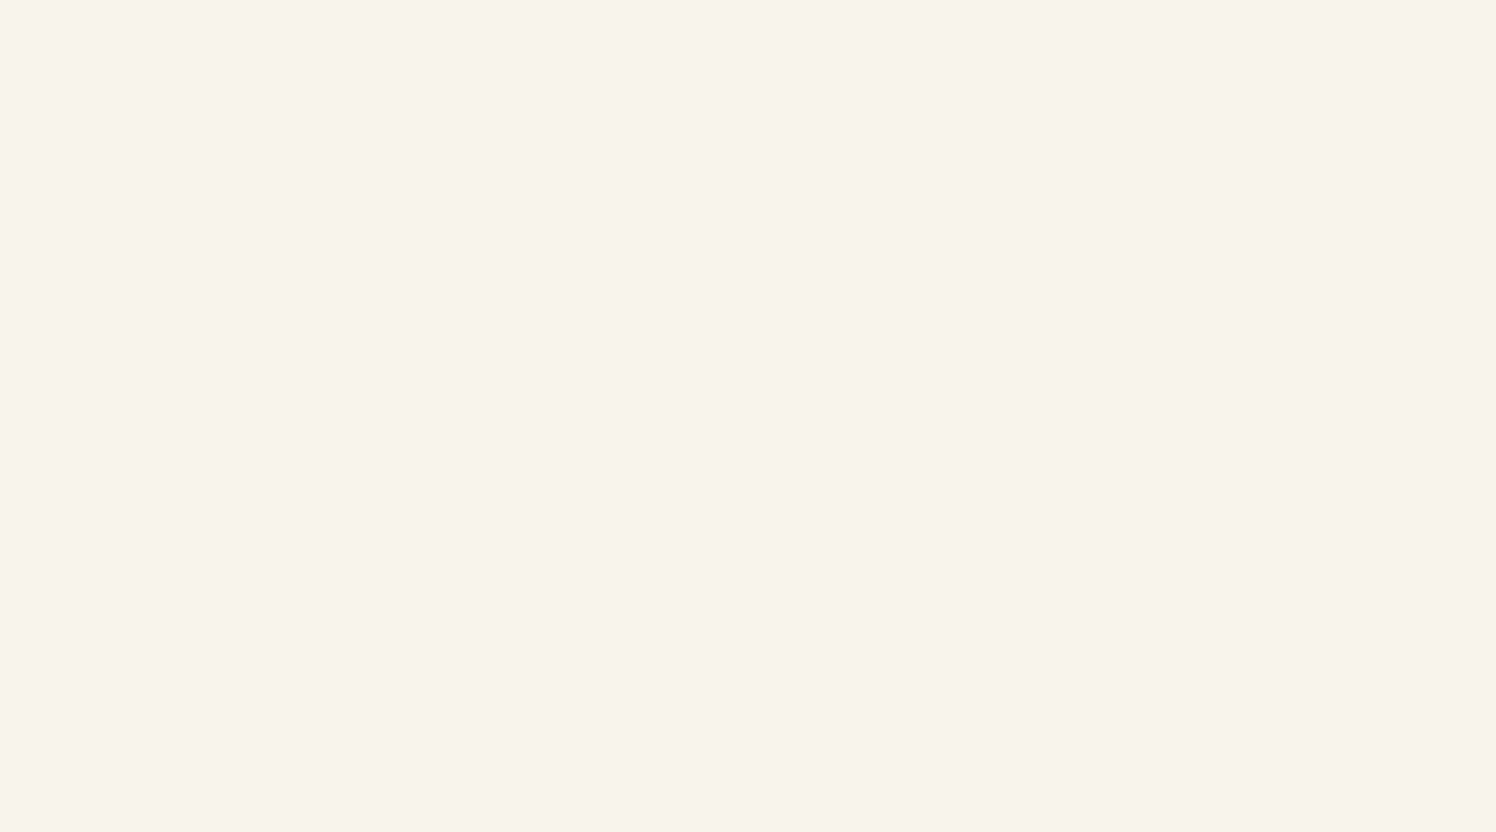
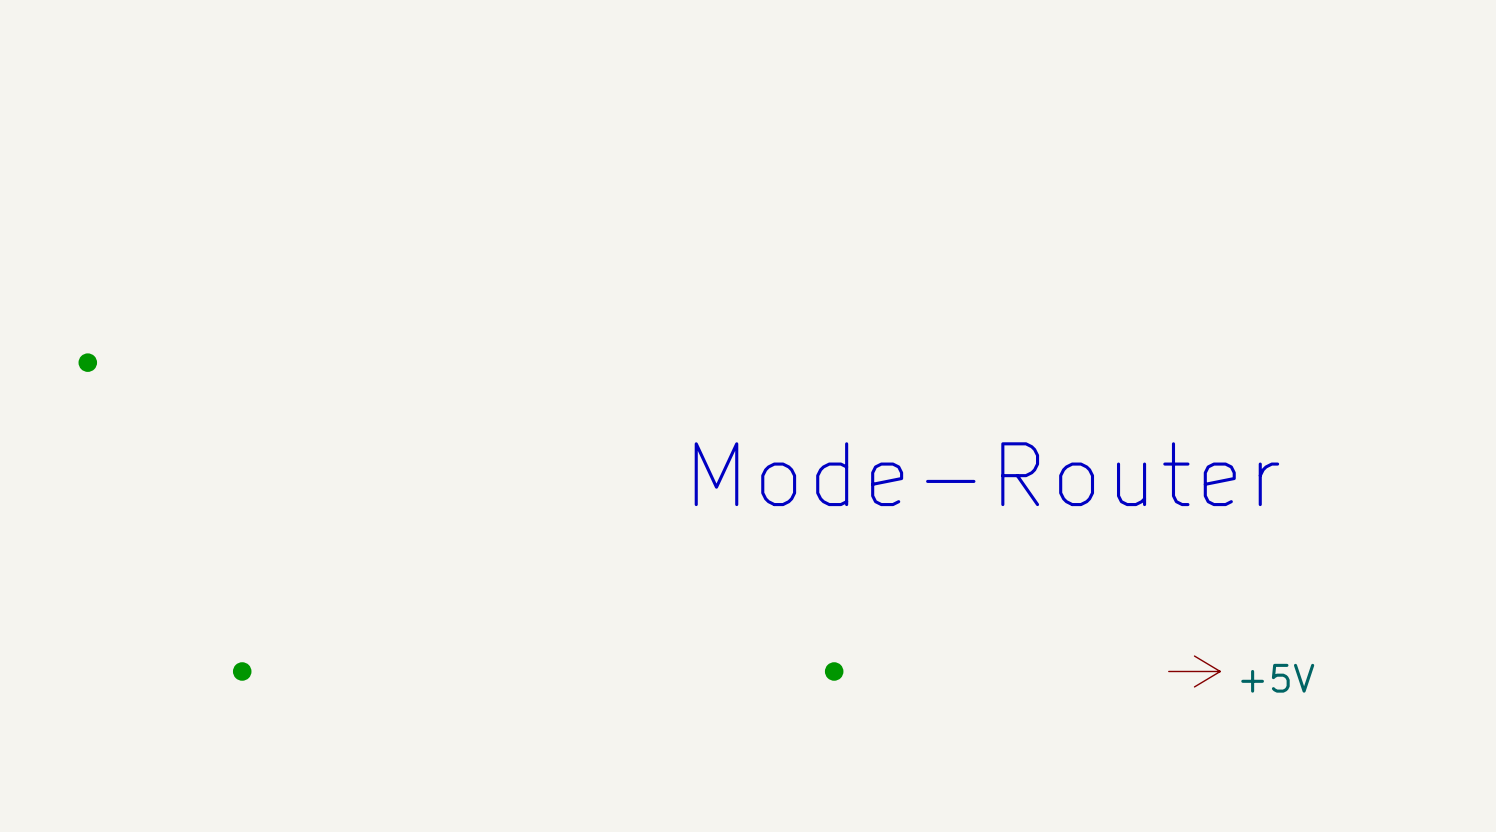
junction: none -> (87, 362)
text: none -> Mode-Router (986, 474)
junction: none -> (242, 671)
junction: none -> (834, 671)
power symbol: none -> +5V (1194, 671)

